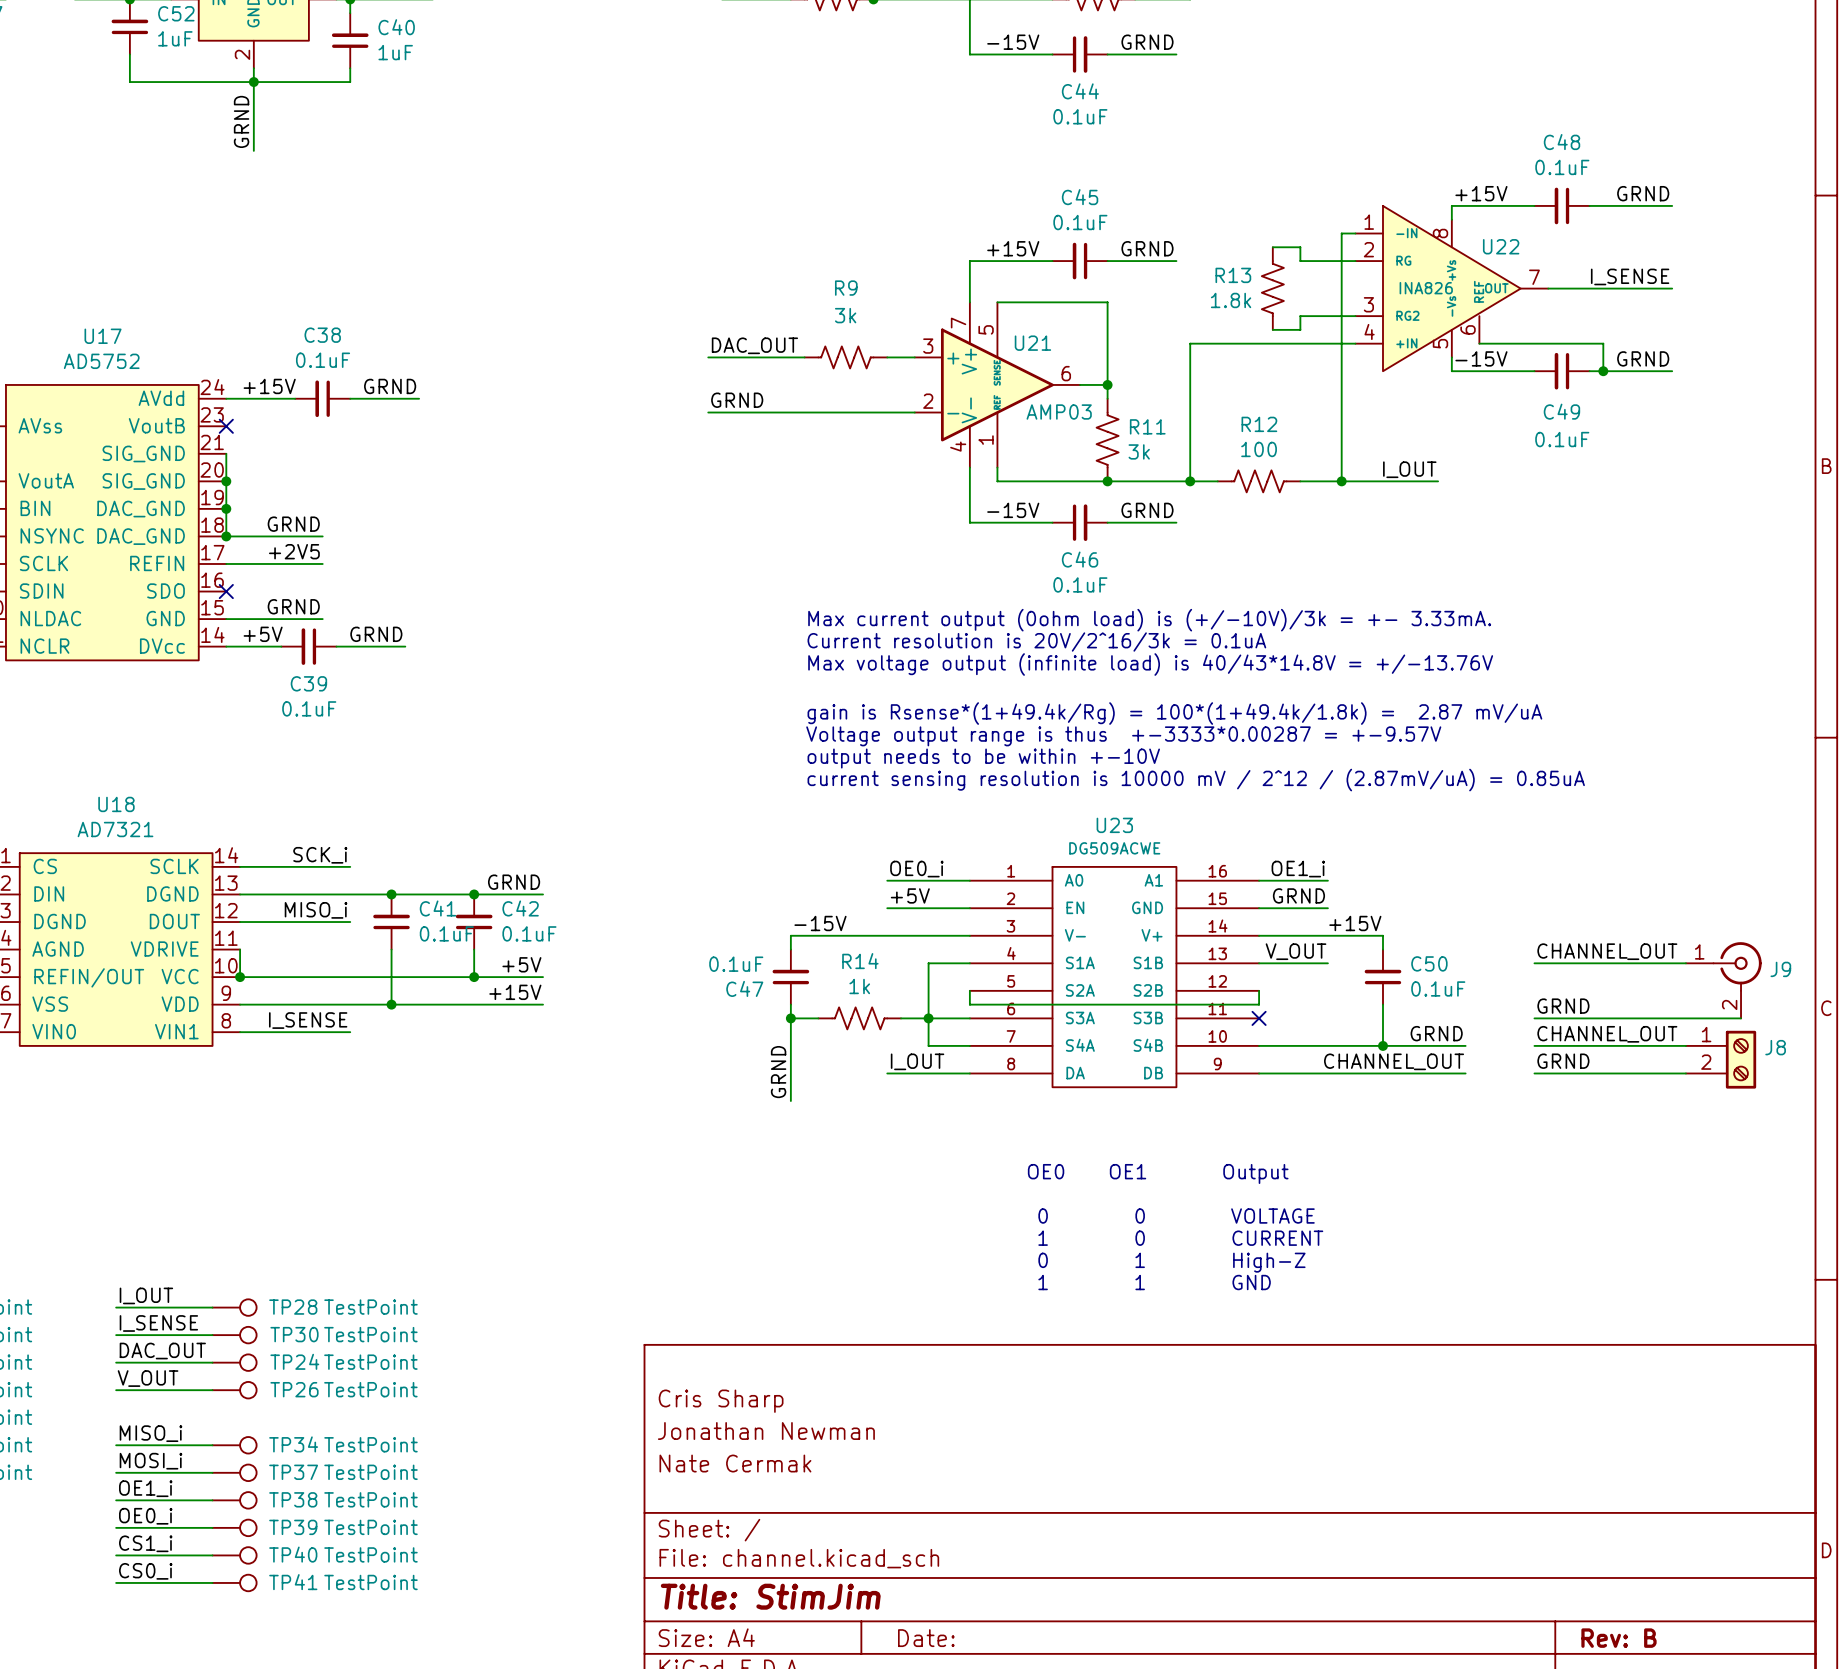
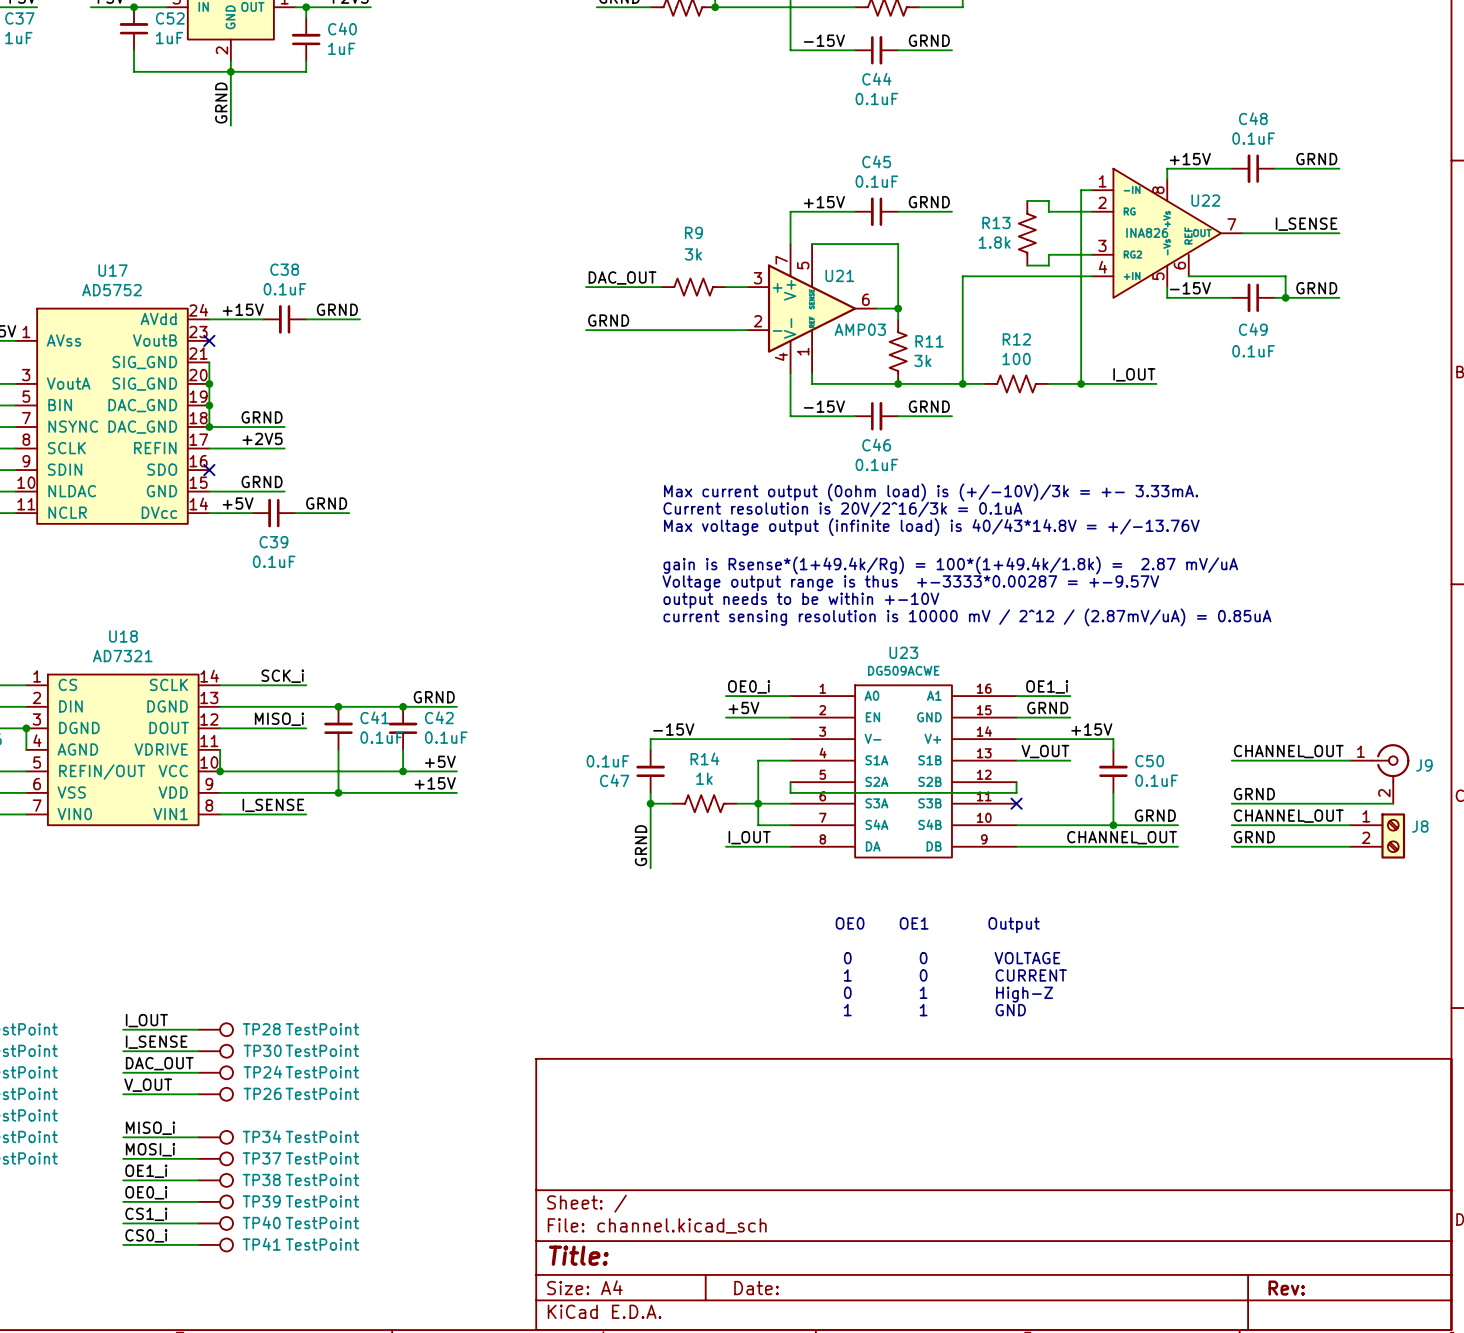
title block: Cris Sharp (721, 1401) -> none
title block: Jonathan Newman (766, 1431) -> none
title block: Nate Cermak (735, 1463) -> none
title block: Title: StimJim (770, 1596) -> Title: (578, 1255)
title block: Rev: B (1618, 1638) -> Rev: (1286, 1288)

